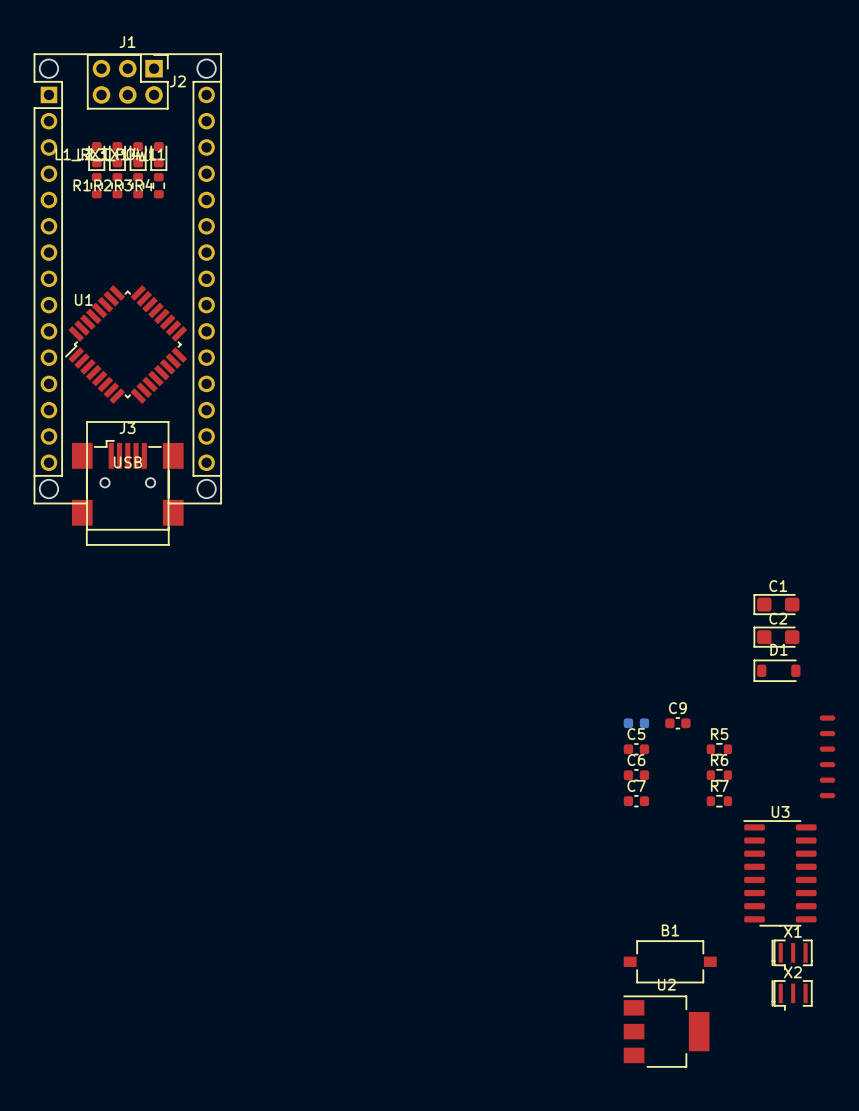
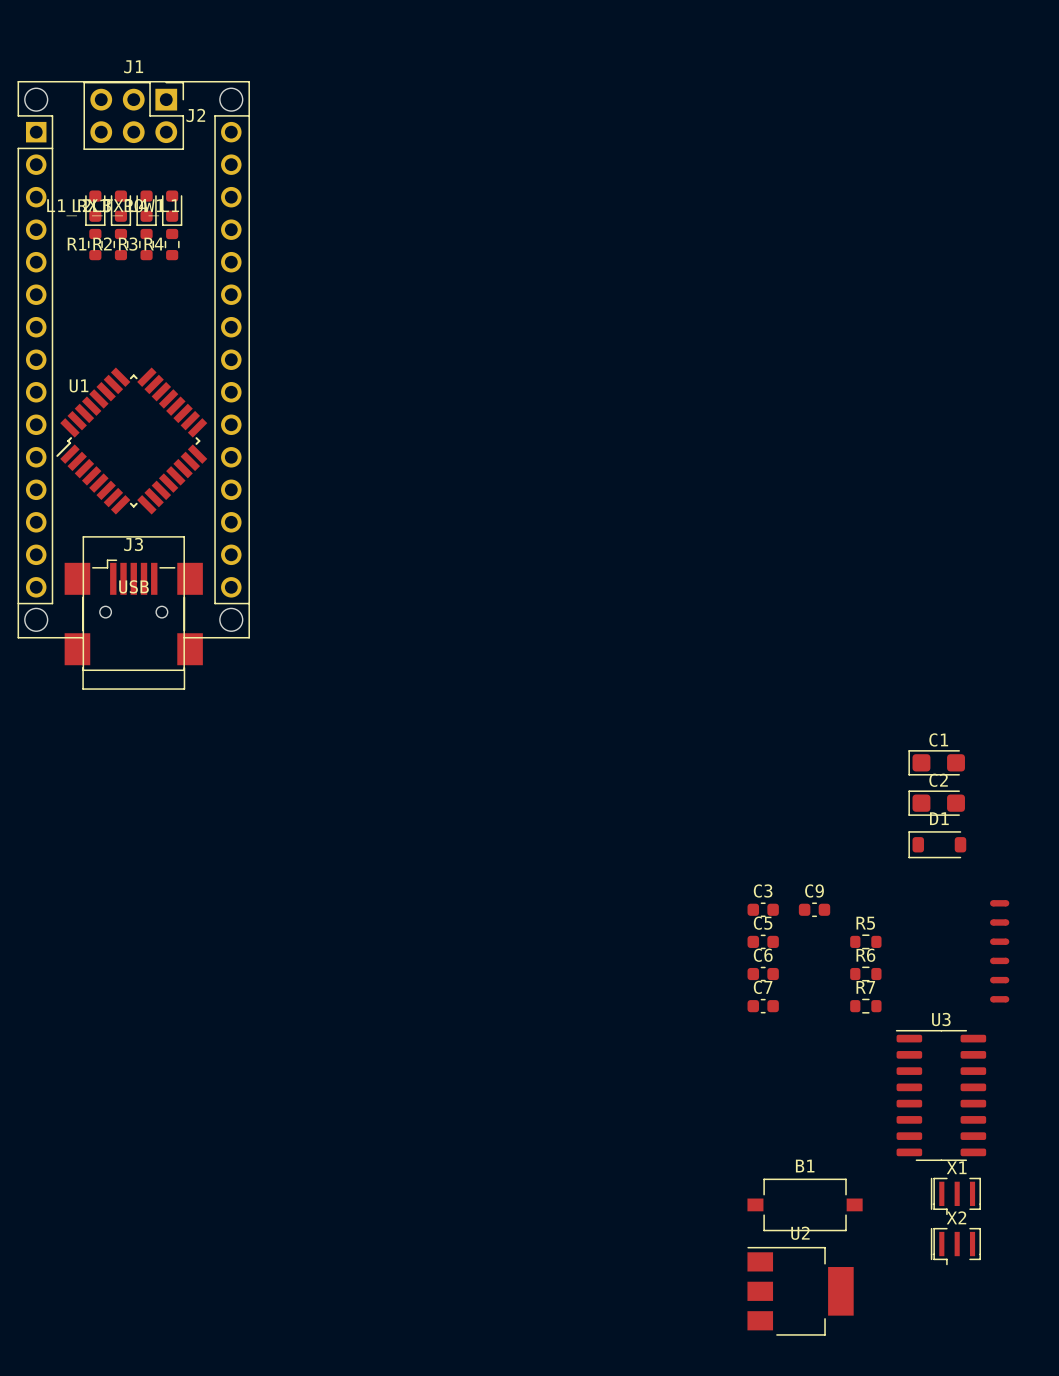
C3 side: bottom (636, 723) -> top (763, 909)

